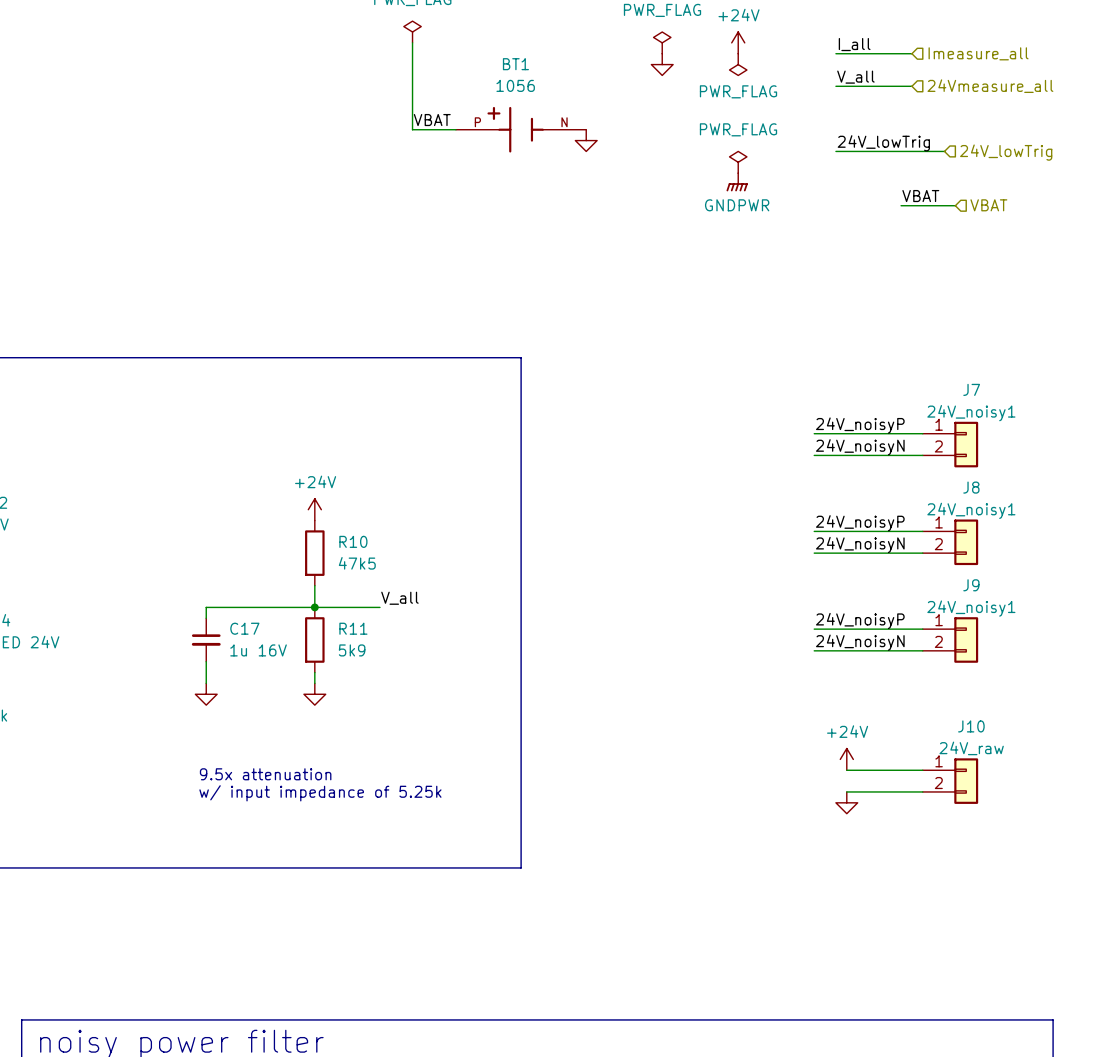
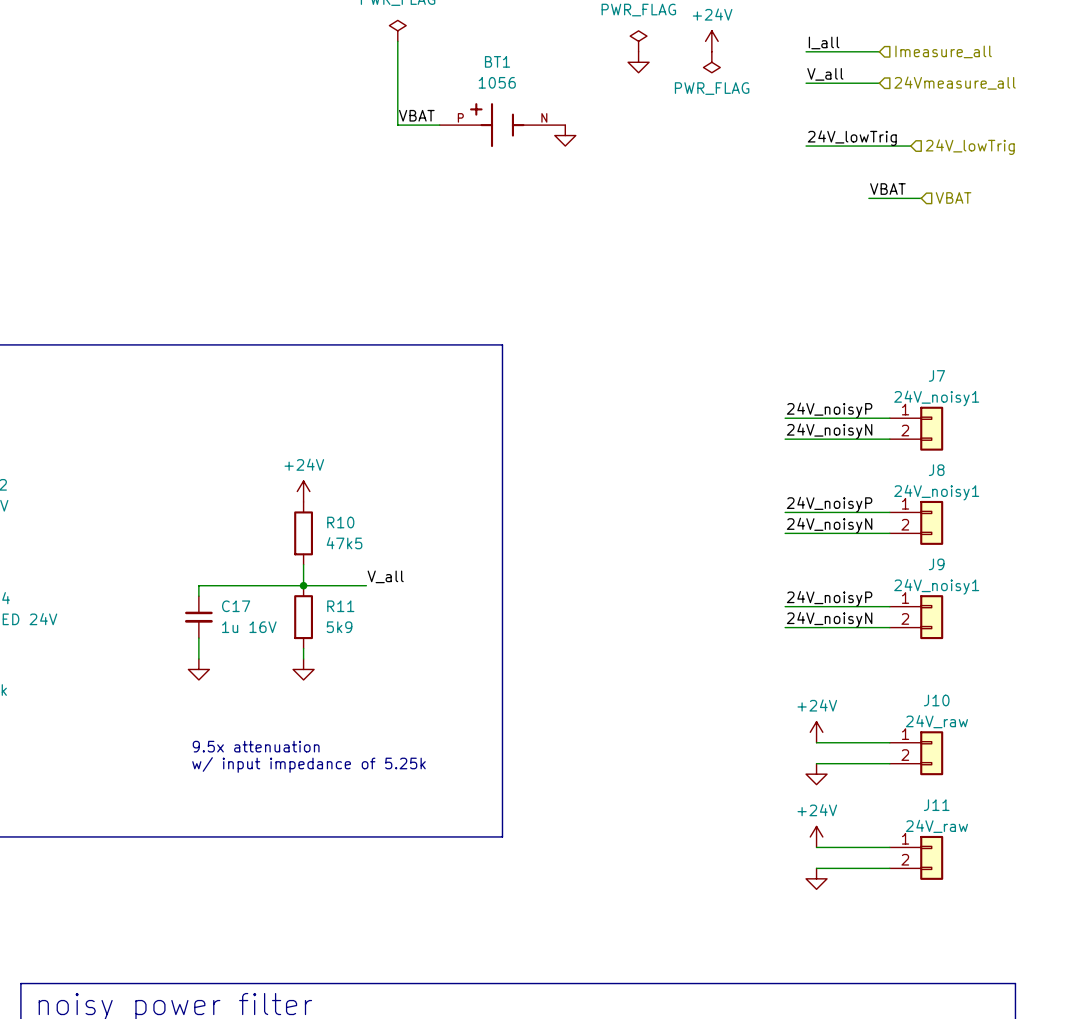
power symbol: PWR_FLAG (738, 162) -> none
power symbol: GNDPWR (737, 182) -> none
power symbol: none -> +24V (816, 836)
wire: none -> (816, 847) (889, 847)
J11: none -> 24V_raw (916, 857)
wire: none -> (816, 868) (889, 868)
power symbol: none -> (816, 878)

